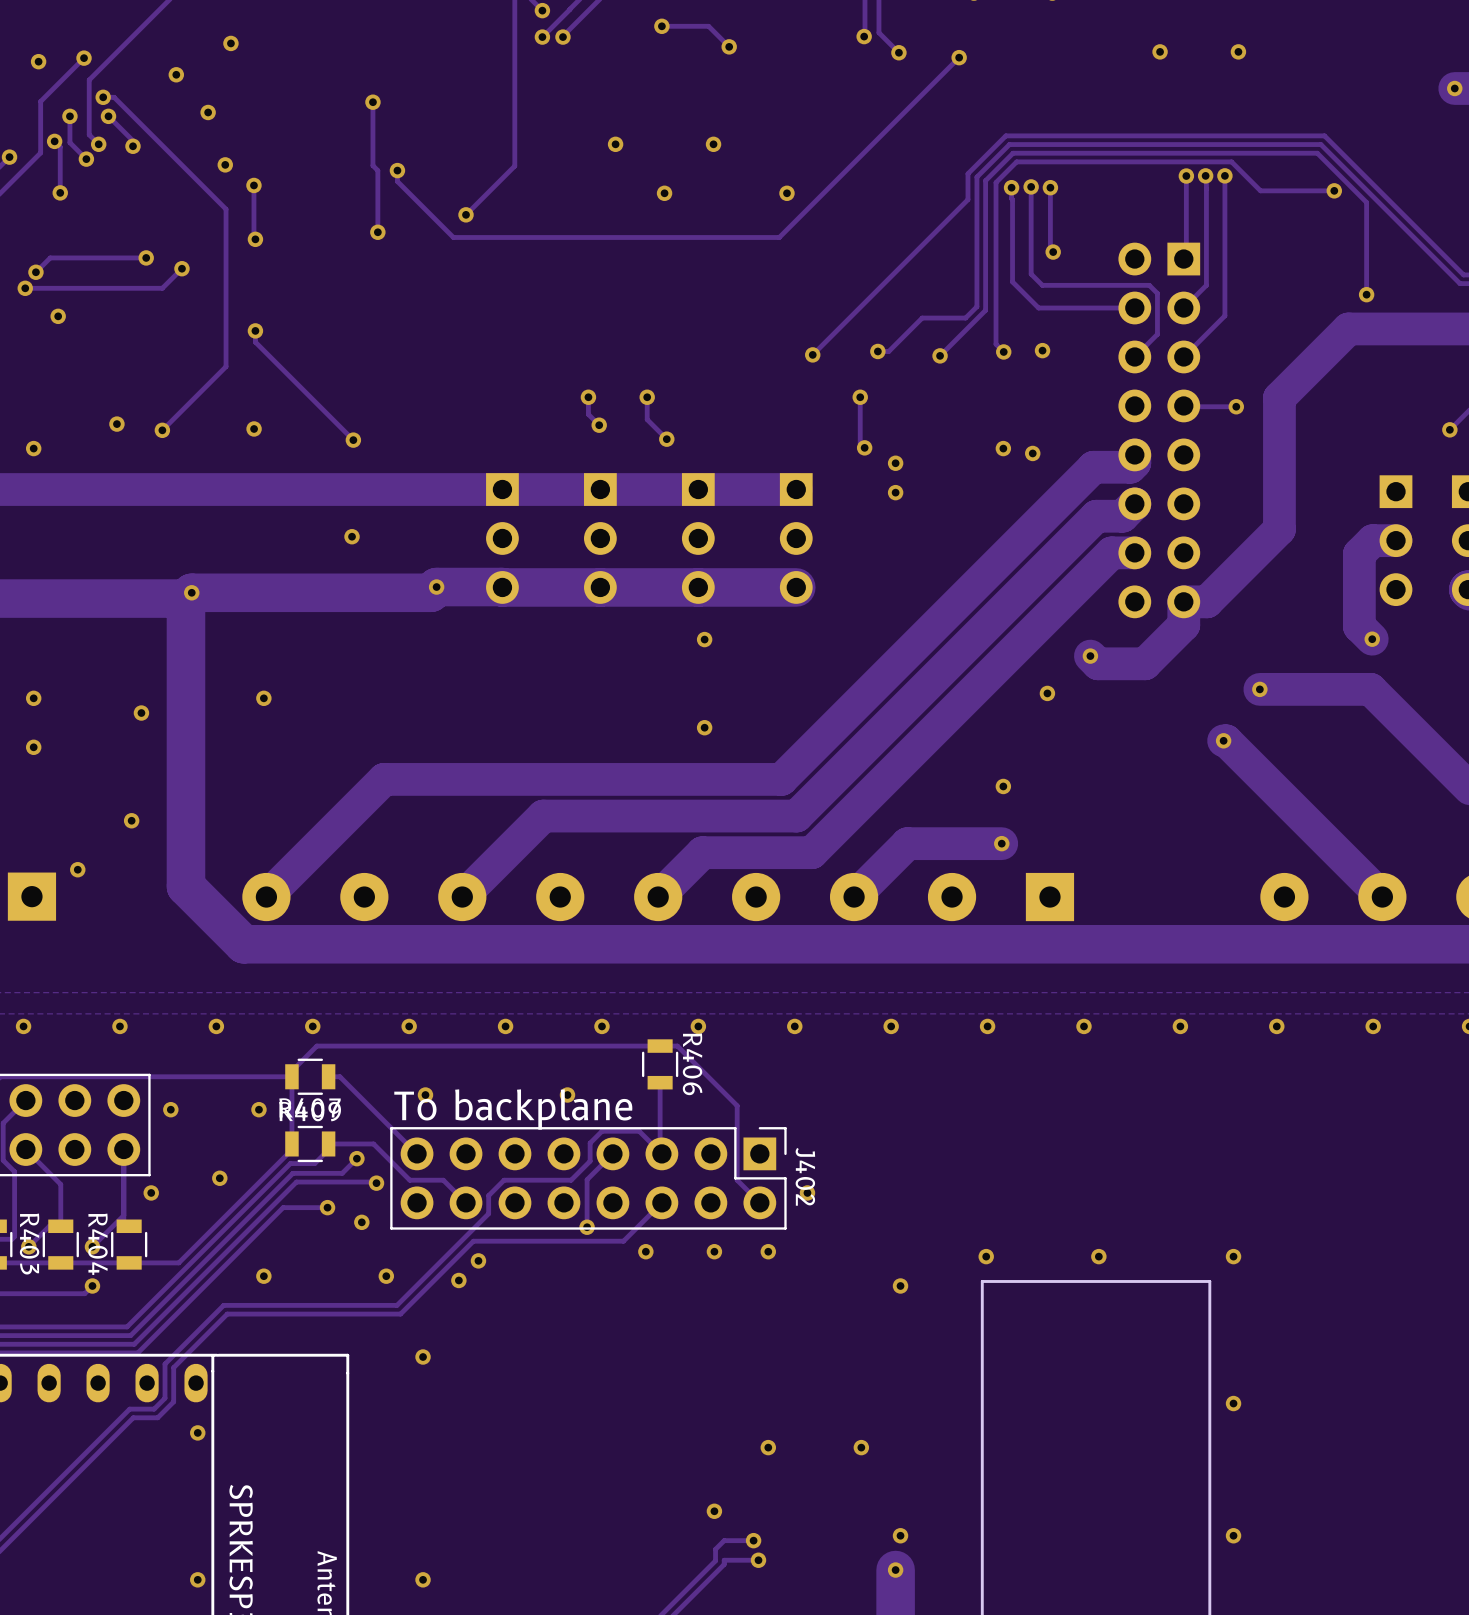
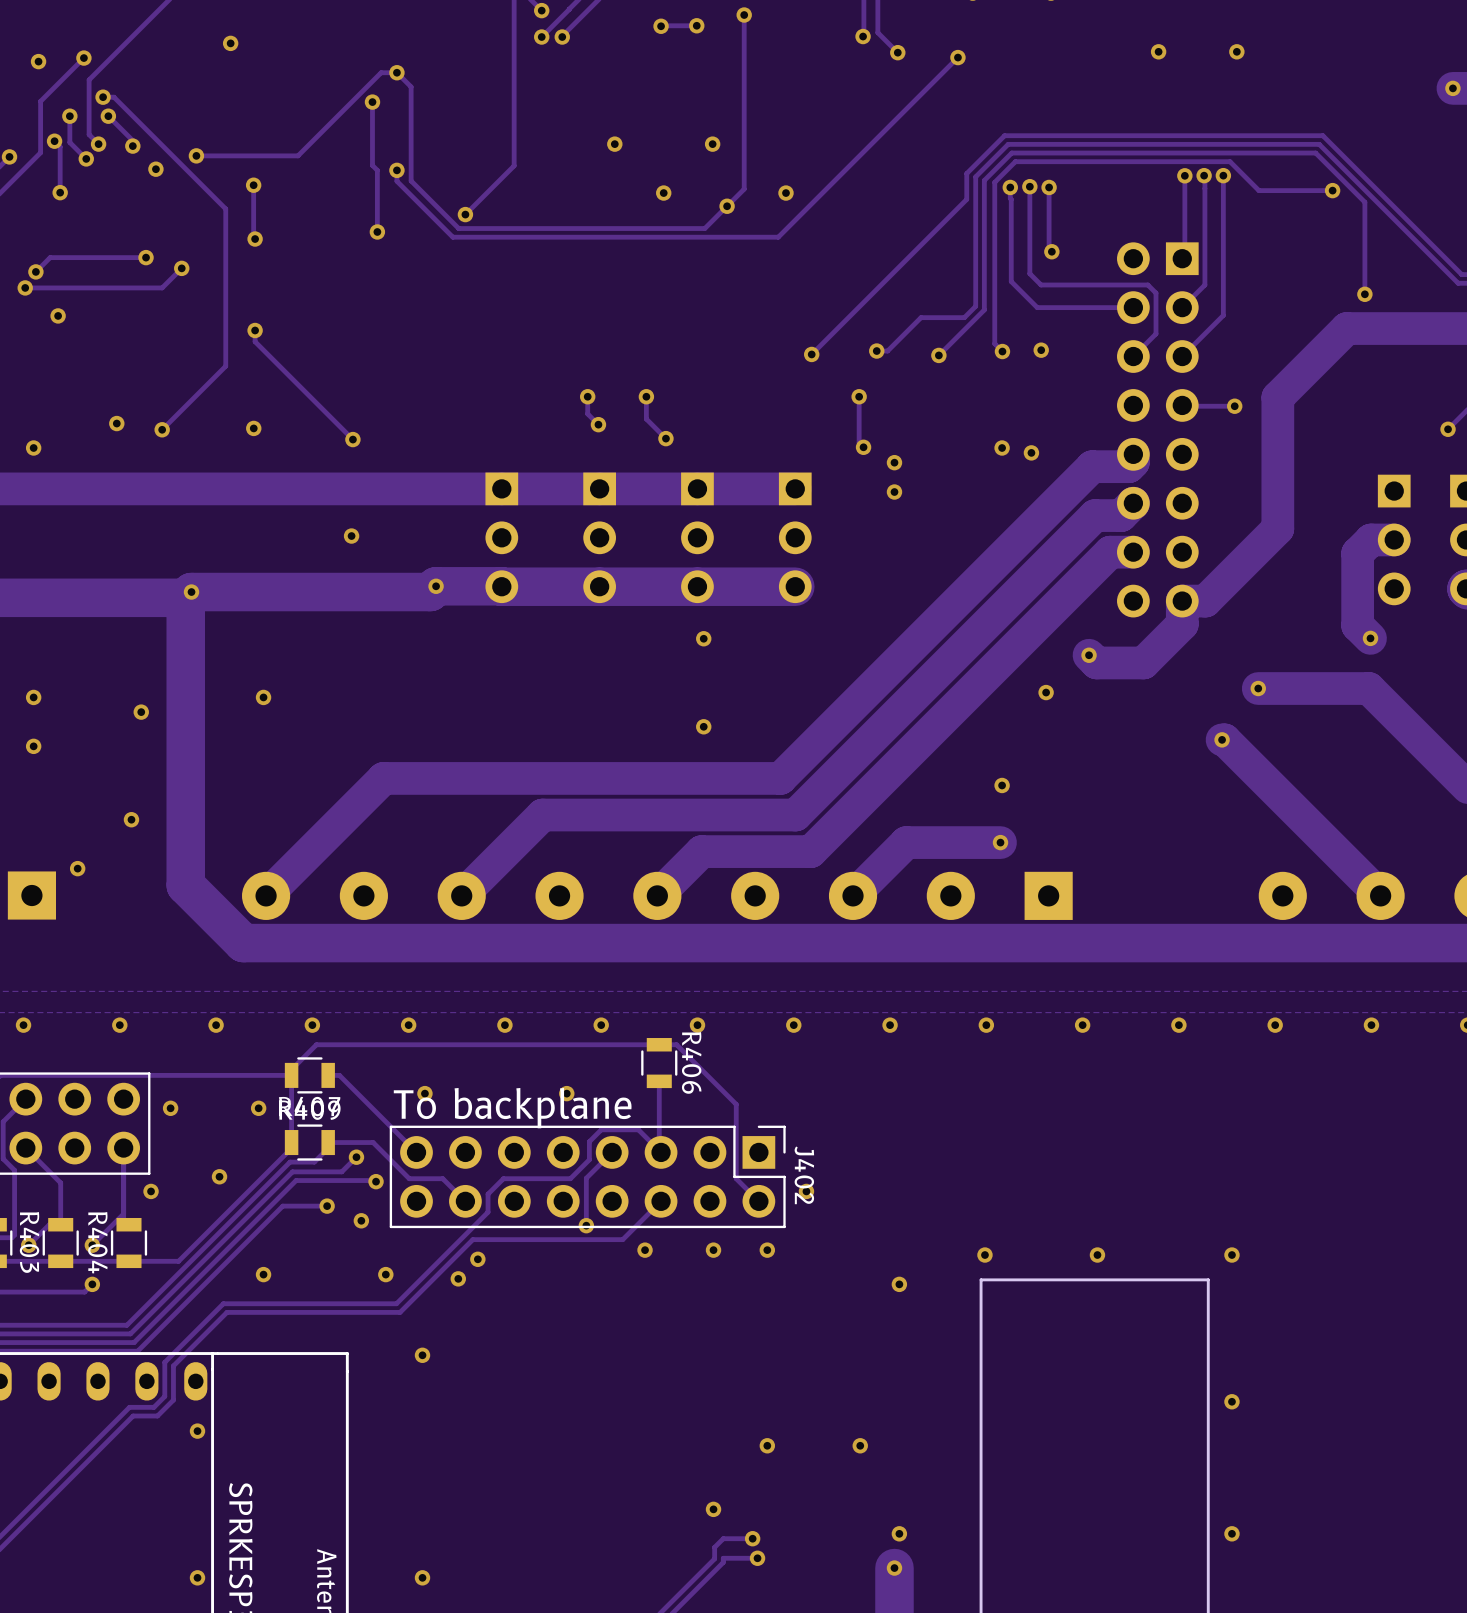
track: none -> (744, 15) (744, 189) (704, 228) (458, 228) (411, 180) (411, 86) (396, 72) (381, 72) (298, 155) (196, 155)
via: none -> (744, 15)
via: none -> (696, 25)
track: (661, 26) (708, 26) (729, 46) -> (661, 25) (696, 25)
via: (729, 46) -> none
via: none -> (396, 72)
via: (176, 74) -> none
via: (208, 112) -> none
via: none -> (196, 155)
via: (225, 164) -> none
via: none -> (155, 169)
via: none -> (727, 206)

